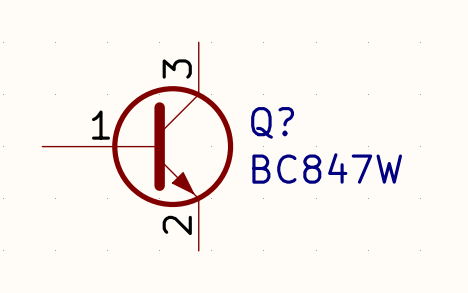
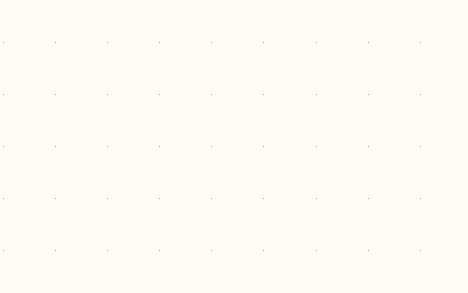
Q?: BC847W (137, 146) -> none

